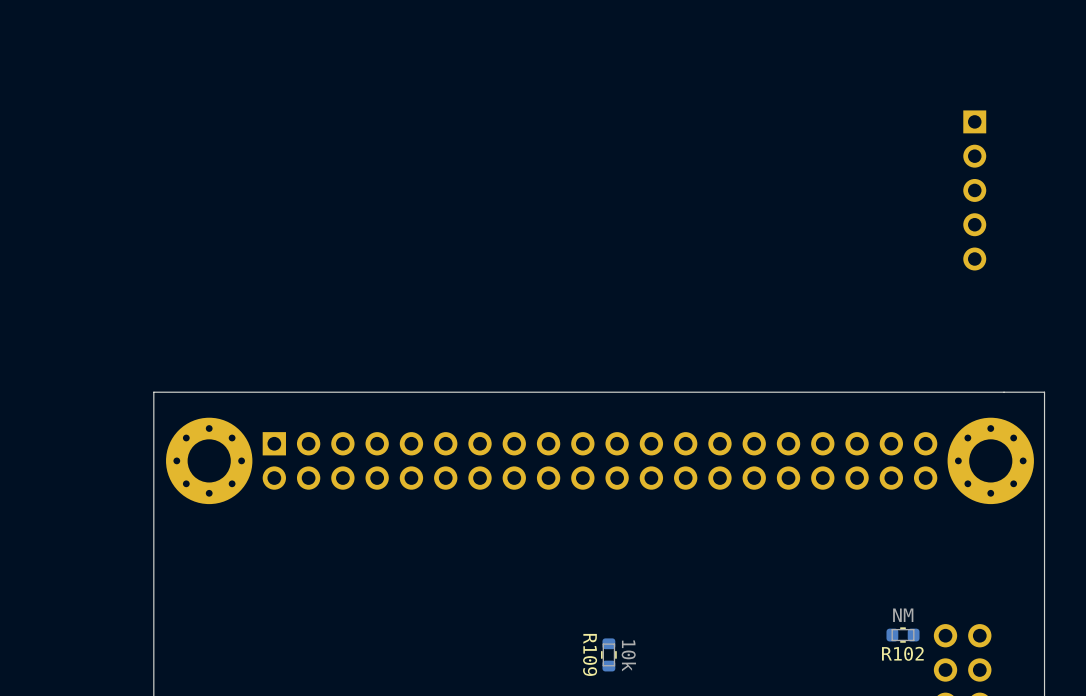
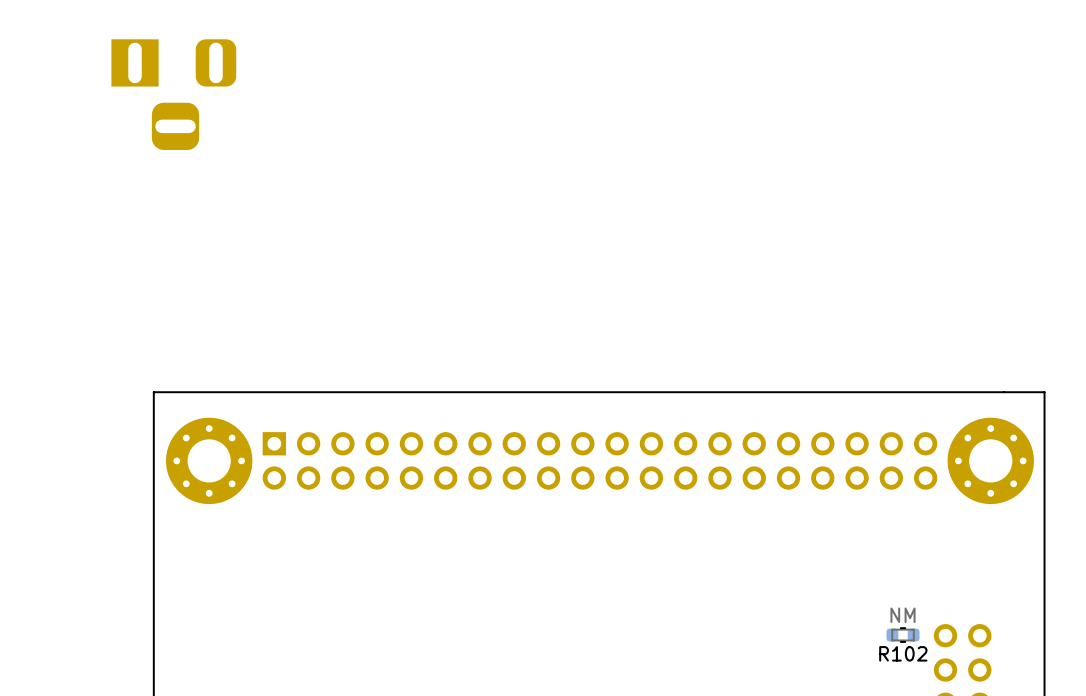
part: none -> (173, 94)
part: (974, 190) -> none
R109: 10k (608, 654) -> none

